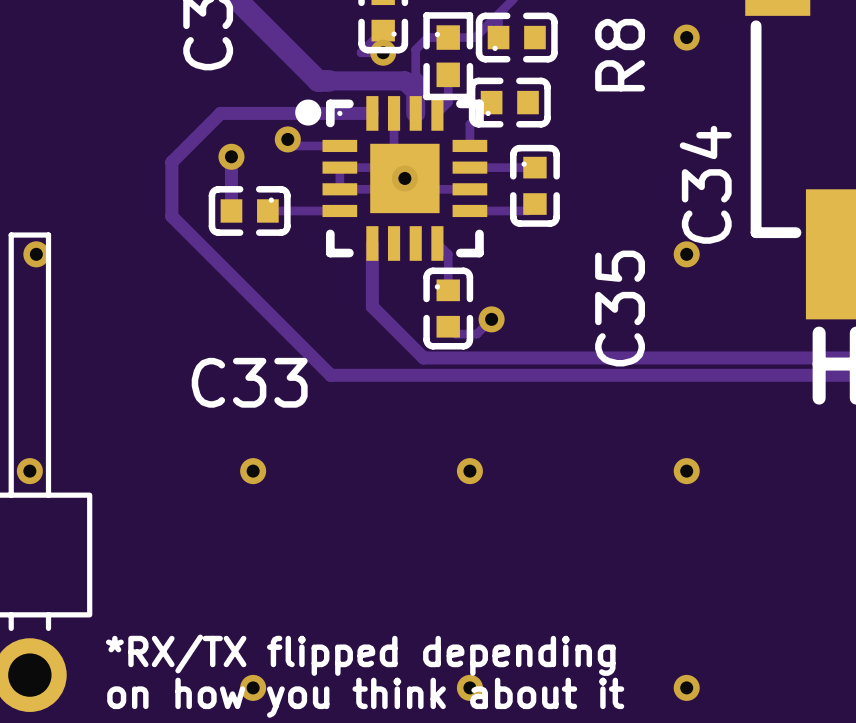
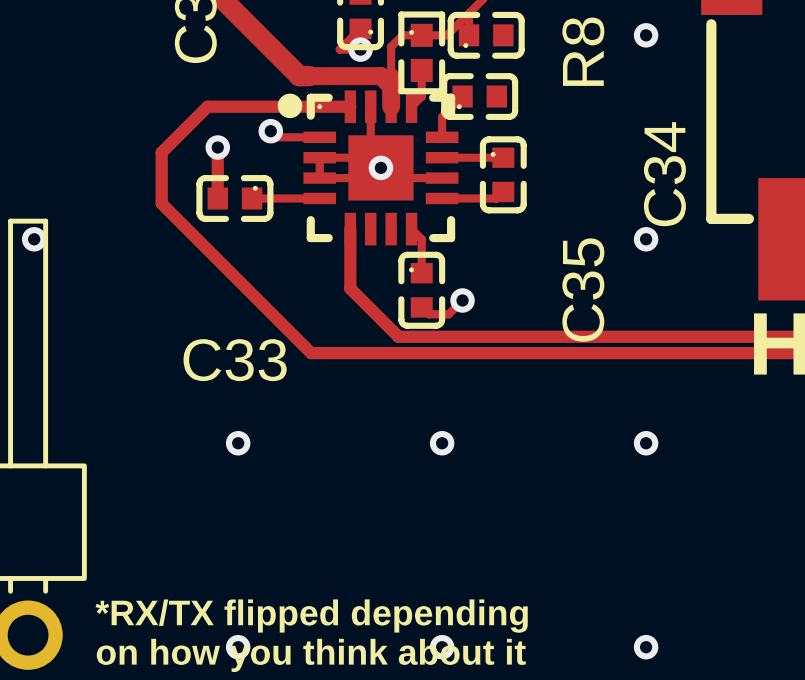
via: (29, 471) -> none

